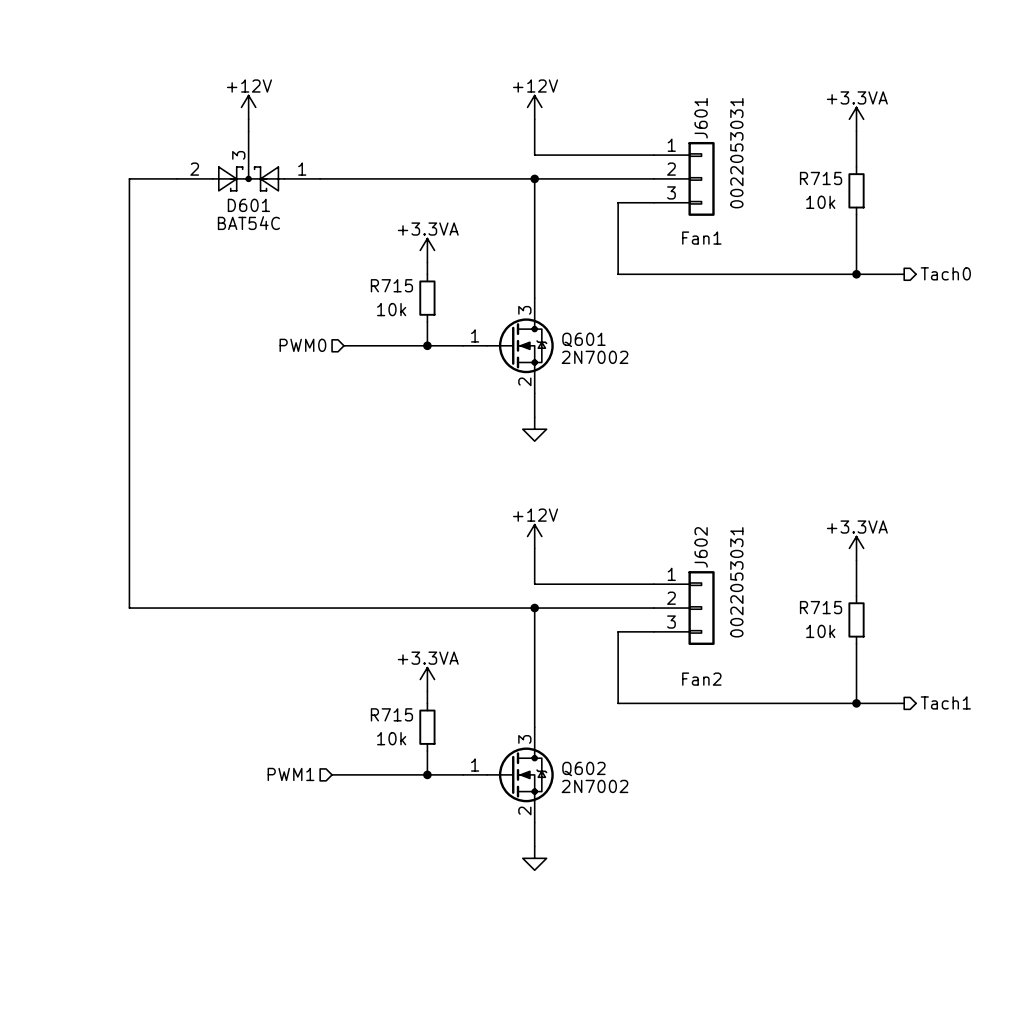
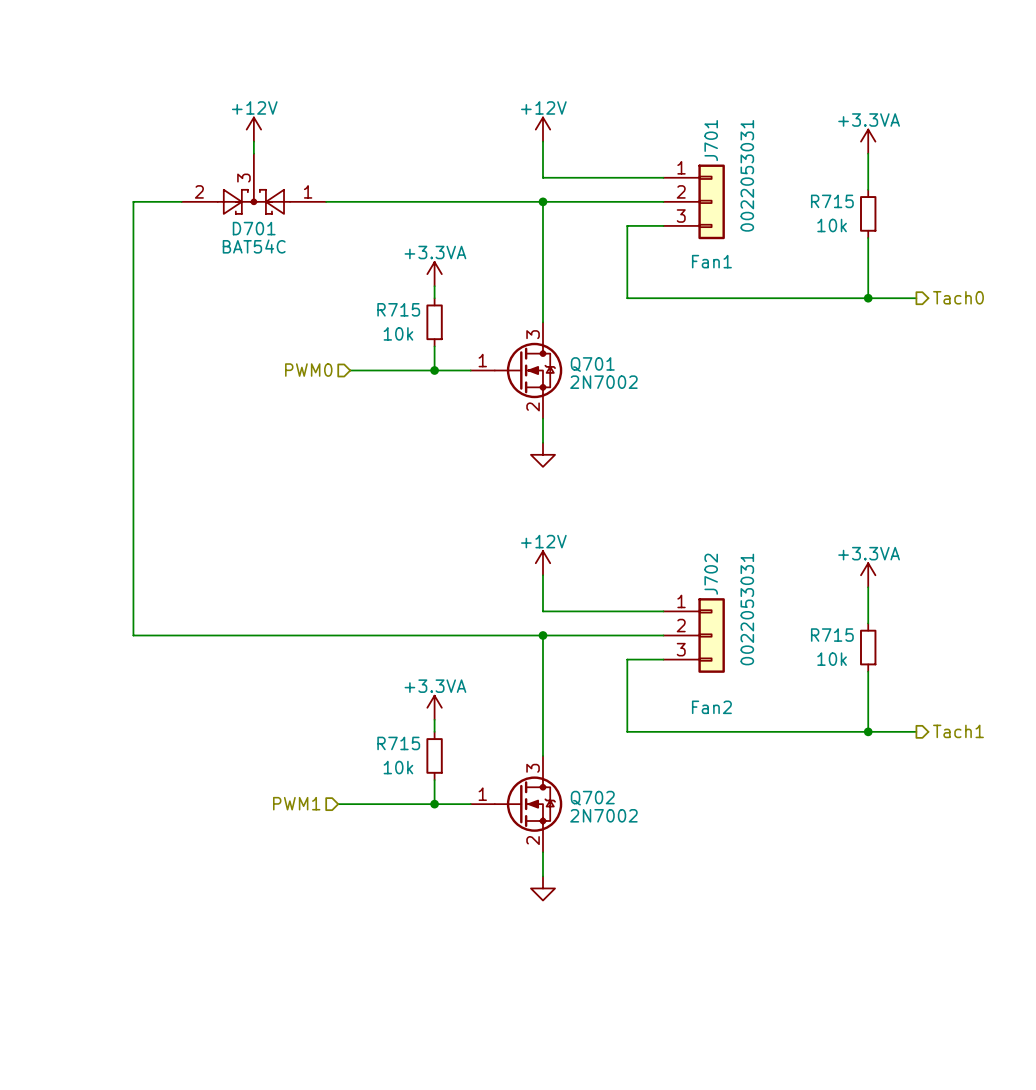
J601 name: J601 (701, 118) -> J701 (711, 140)
D601 name: D601 (248, 205) -> D701 (254, 228)
Q601 name: Q601 (583, 339) -> Q701 (592, 364)
J602 name: J602 (701, 547) -> J702 (711, 574)
Q602 name: Q602 (583, 768) -> Q702 (592, 798)

